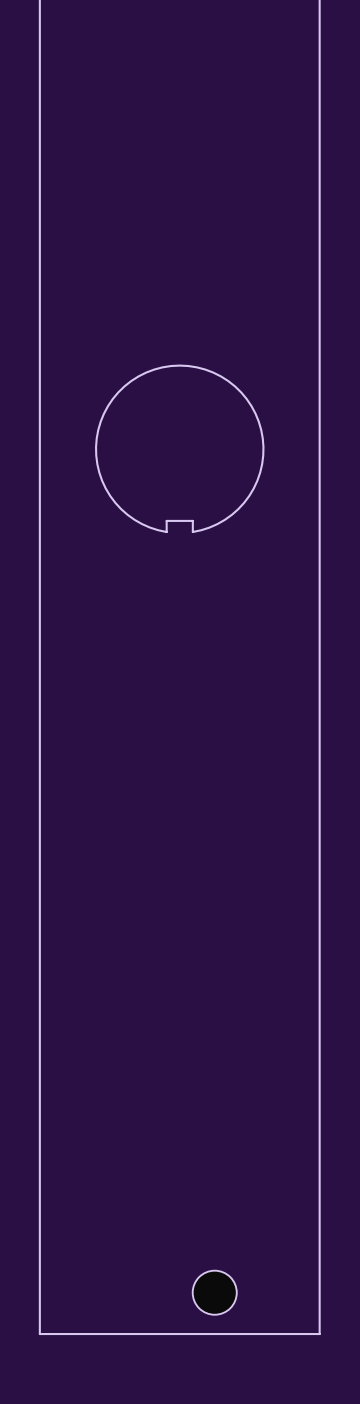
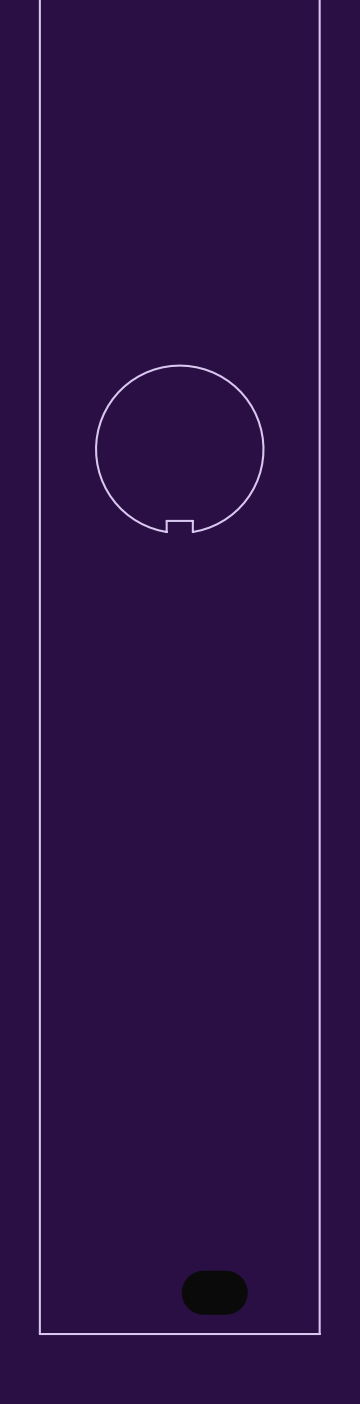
part footprint: [192, 1270, 237, 1315] -> [181, 1270, 248, 1315]

